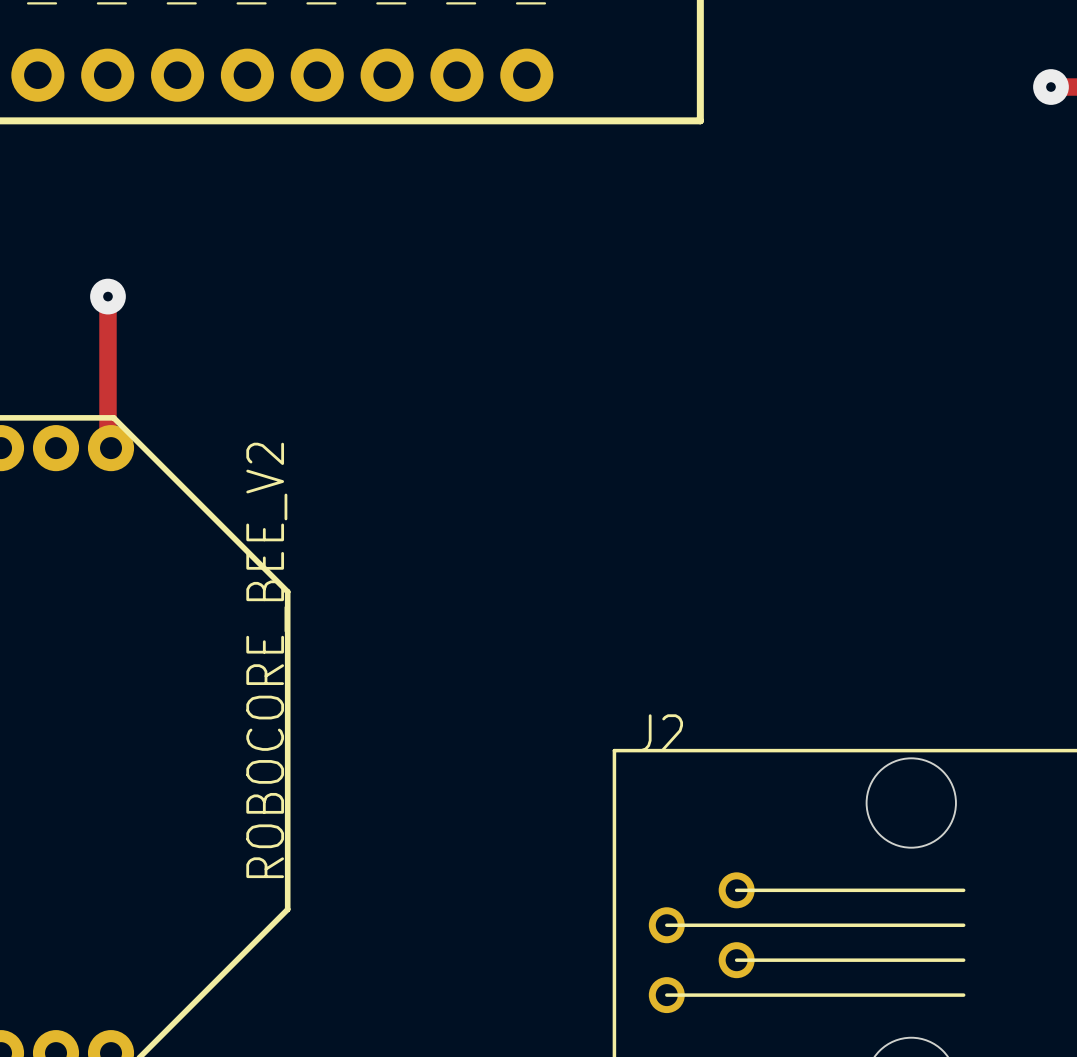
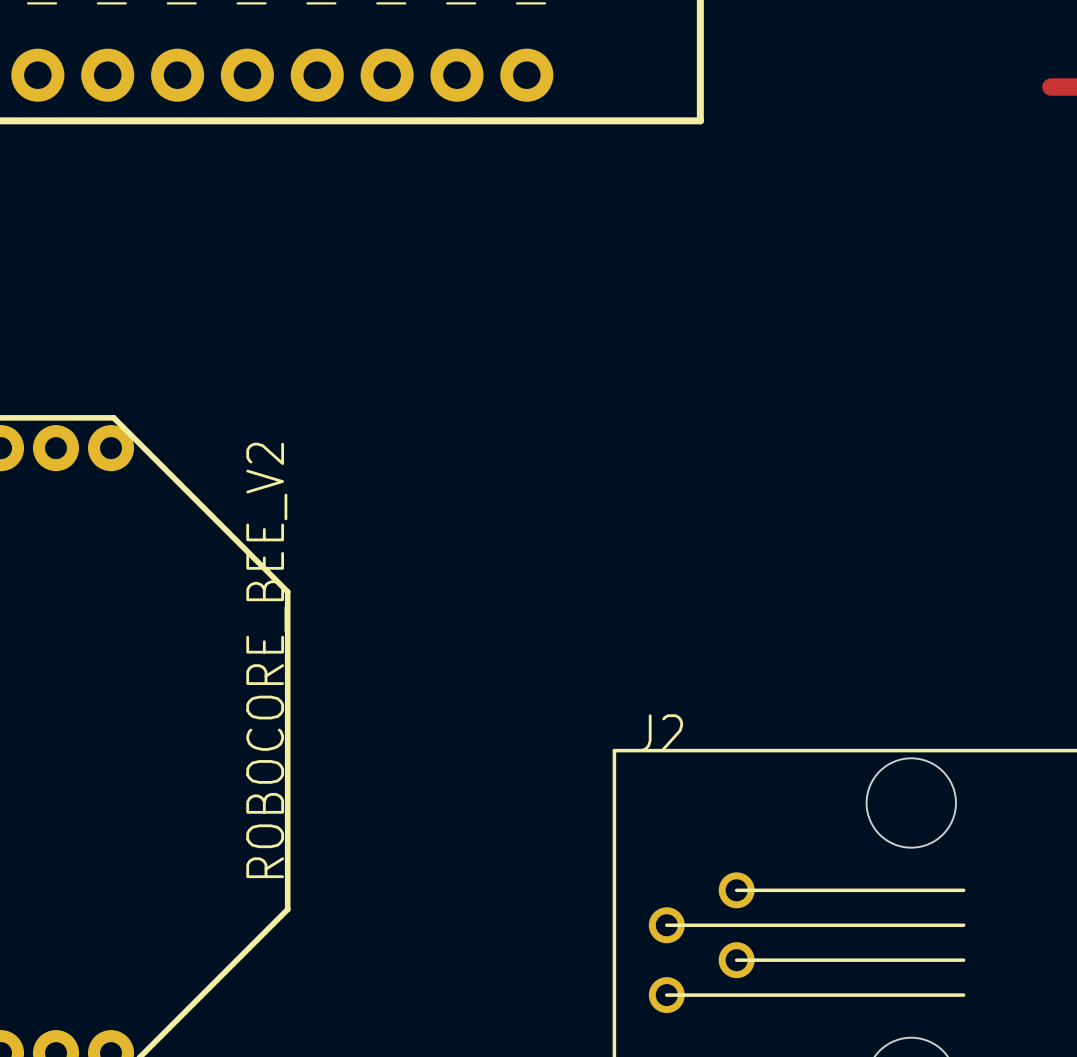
via: (1050, 87) -> none
track: (107, 296) (107, 445) (111, 448) -> none
via: (107, 296) -> none

